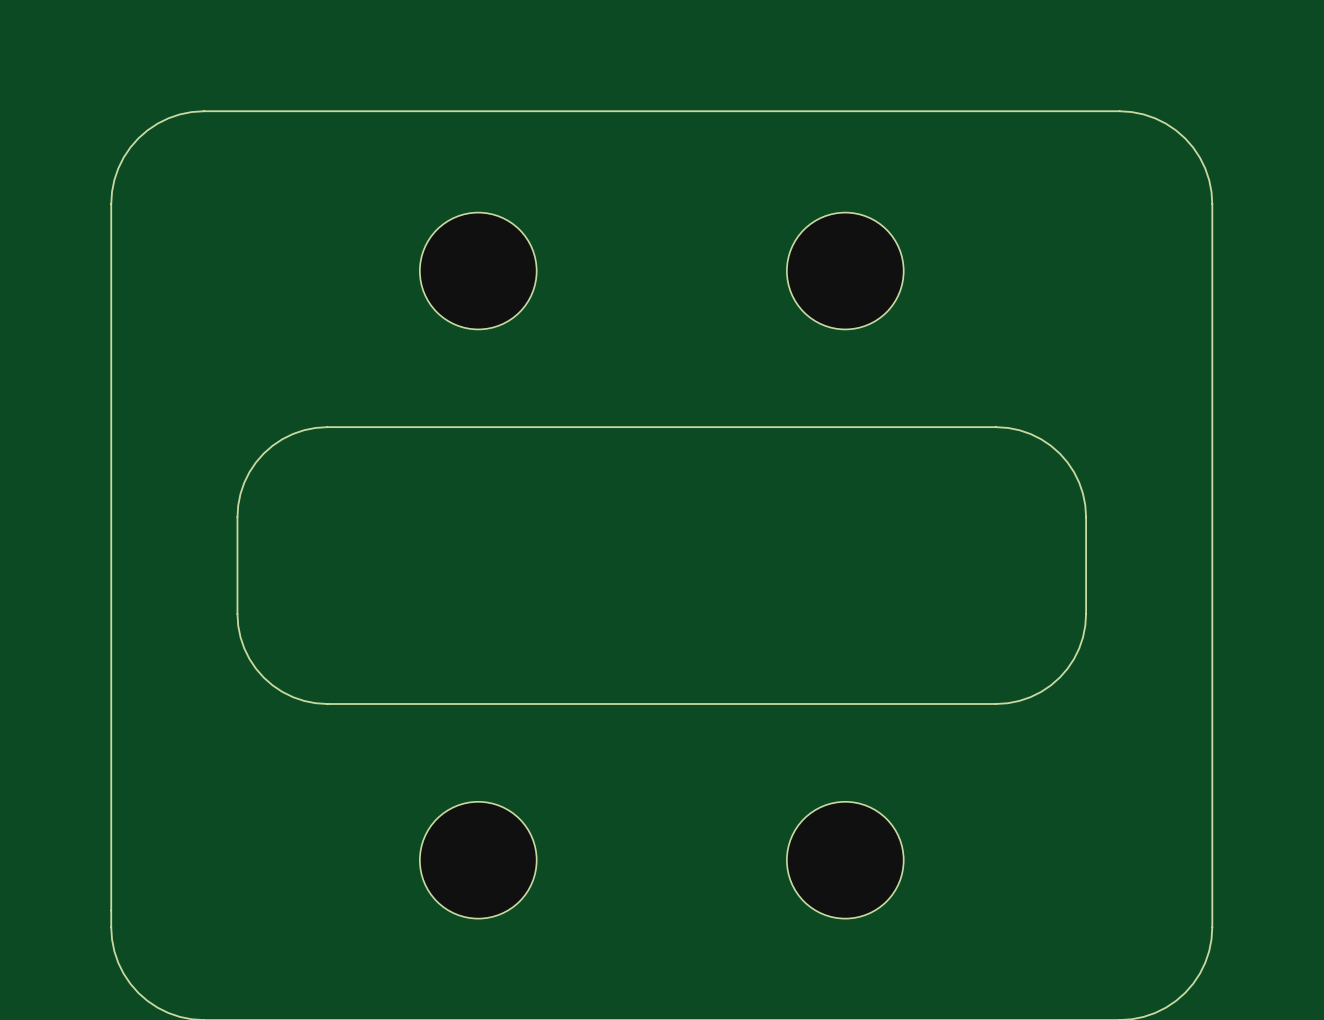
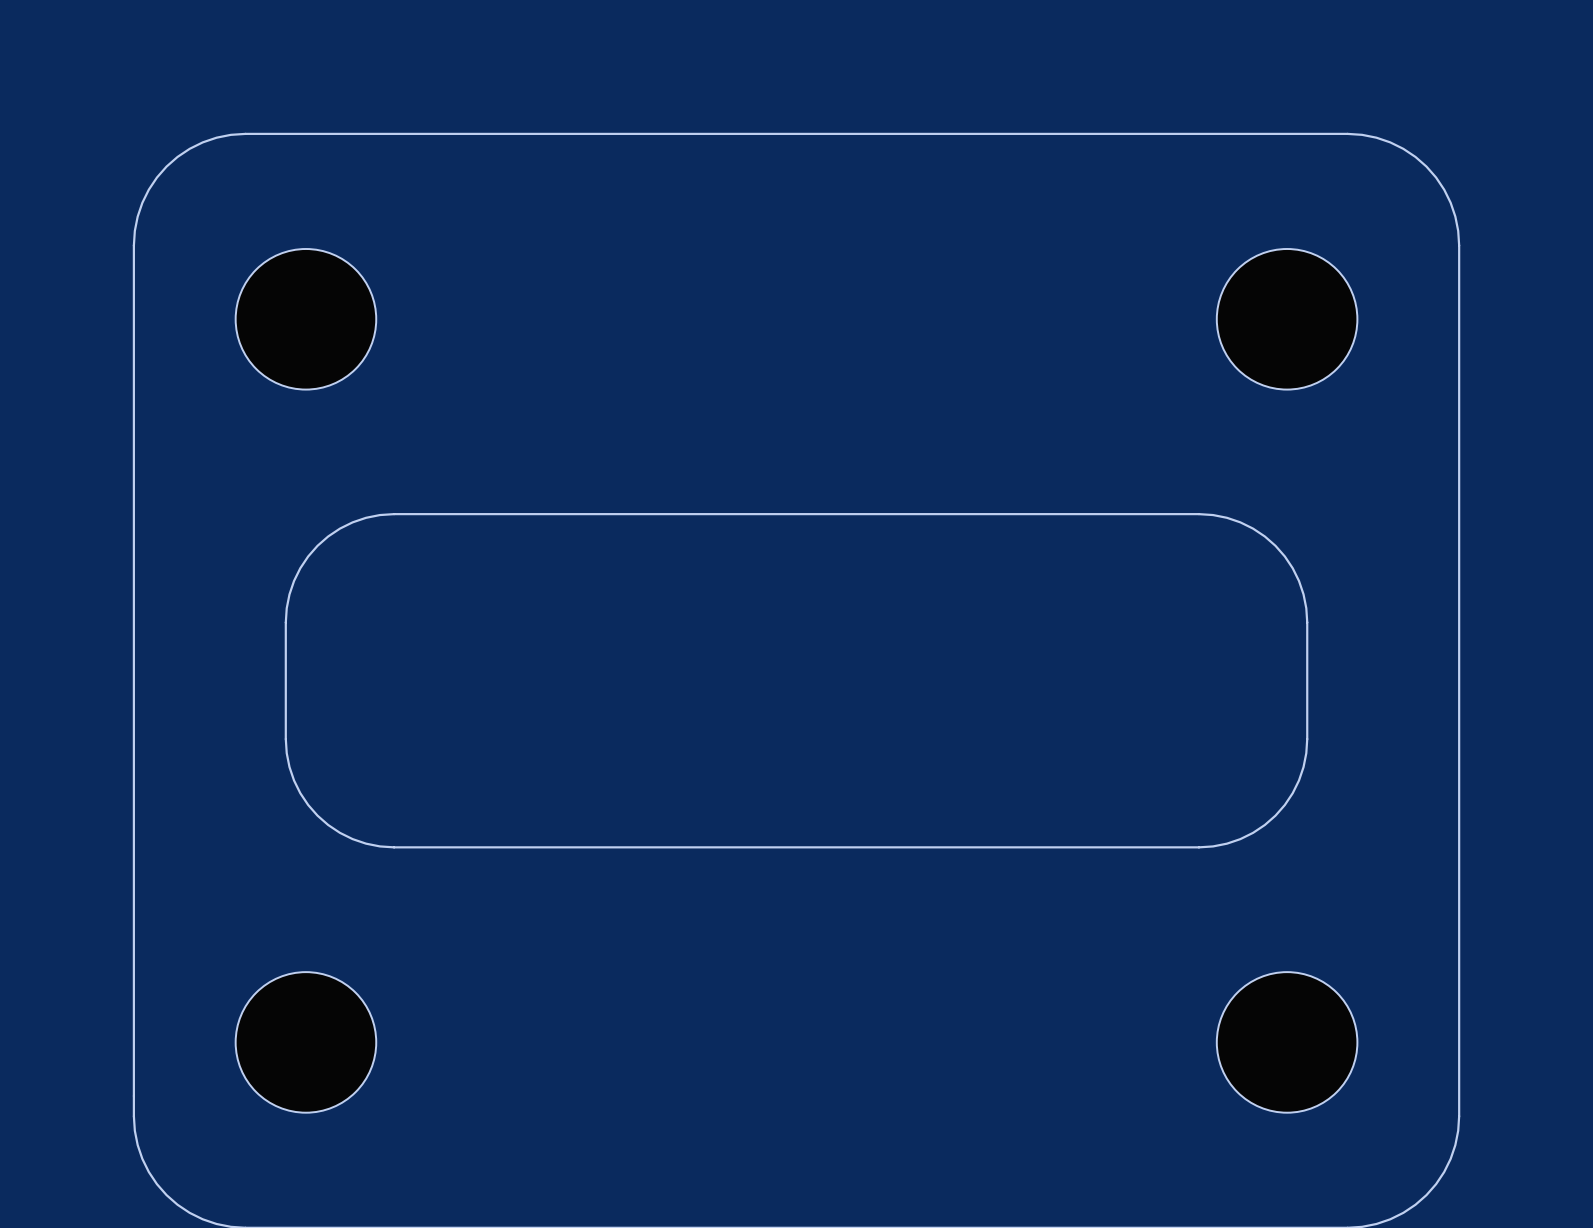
part position: (478, 271) -> (305, 319)
part position: (845, 271) -> (1287, 319)
part position: (478, 860) -> (305, 1042)
part position: (845, 860) -> (1287, 1042)

